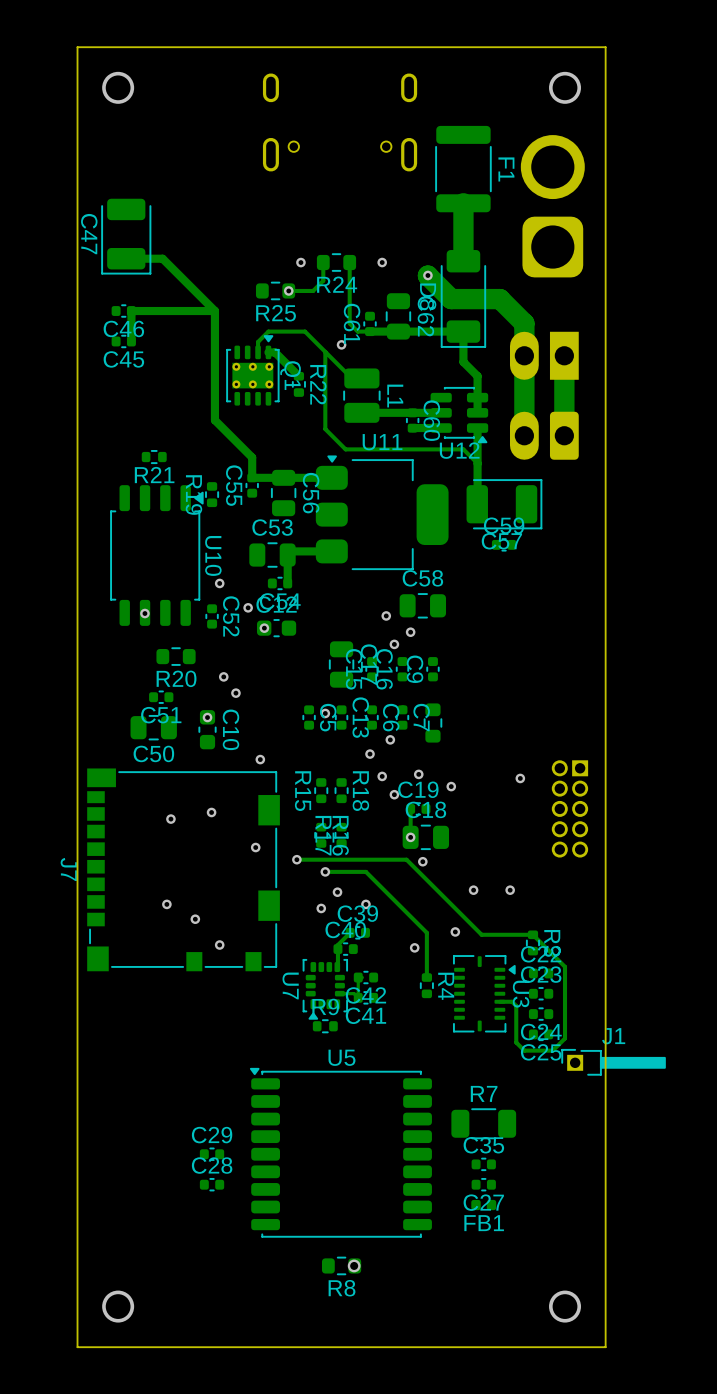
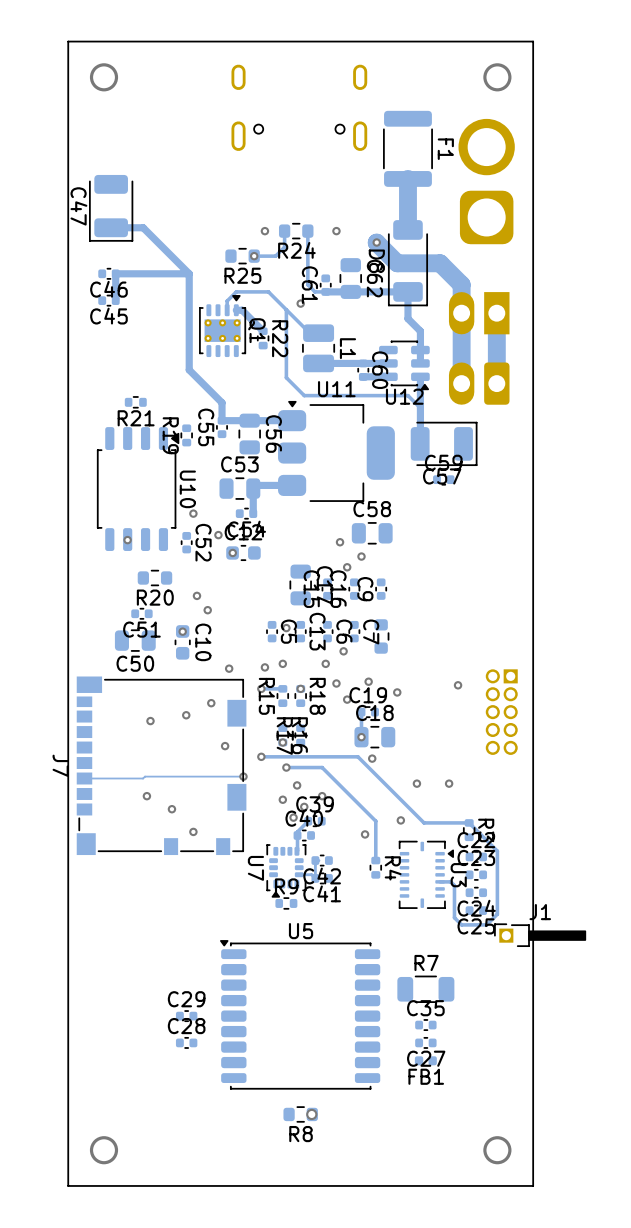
via: none -> (282, 663)
via: none -> (264, 667)
via: none -> (261, 688)
track: none -> (282, 688) (261, 688)
via: none -> (300, 688)
via: none -> (211, 703)
via: none -> (282, 742)
track: none -> (243, 776) (84, 778)
via: none -> (243, 776)
via: none -> (304, 806)
via: none -> (293, 817)

